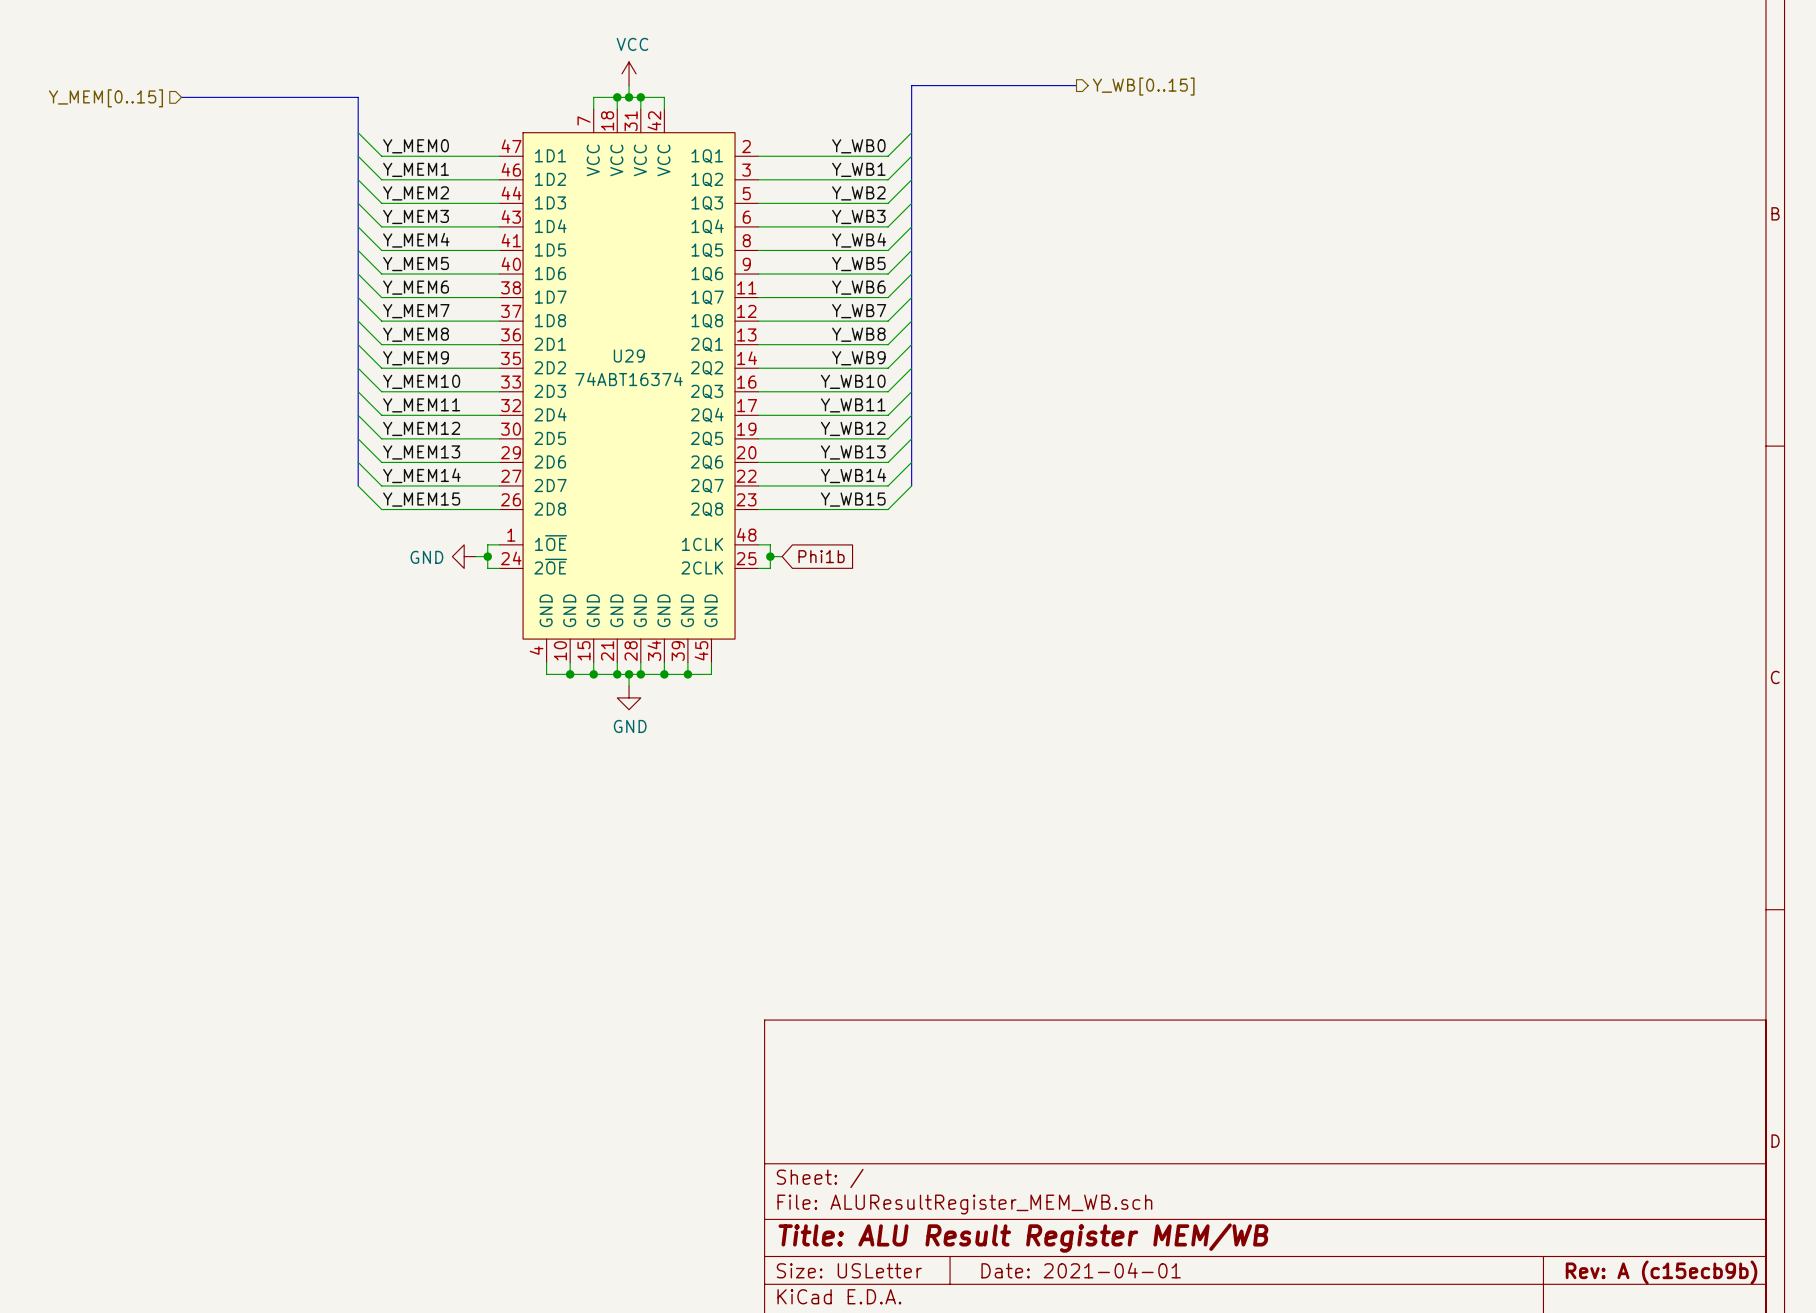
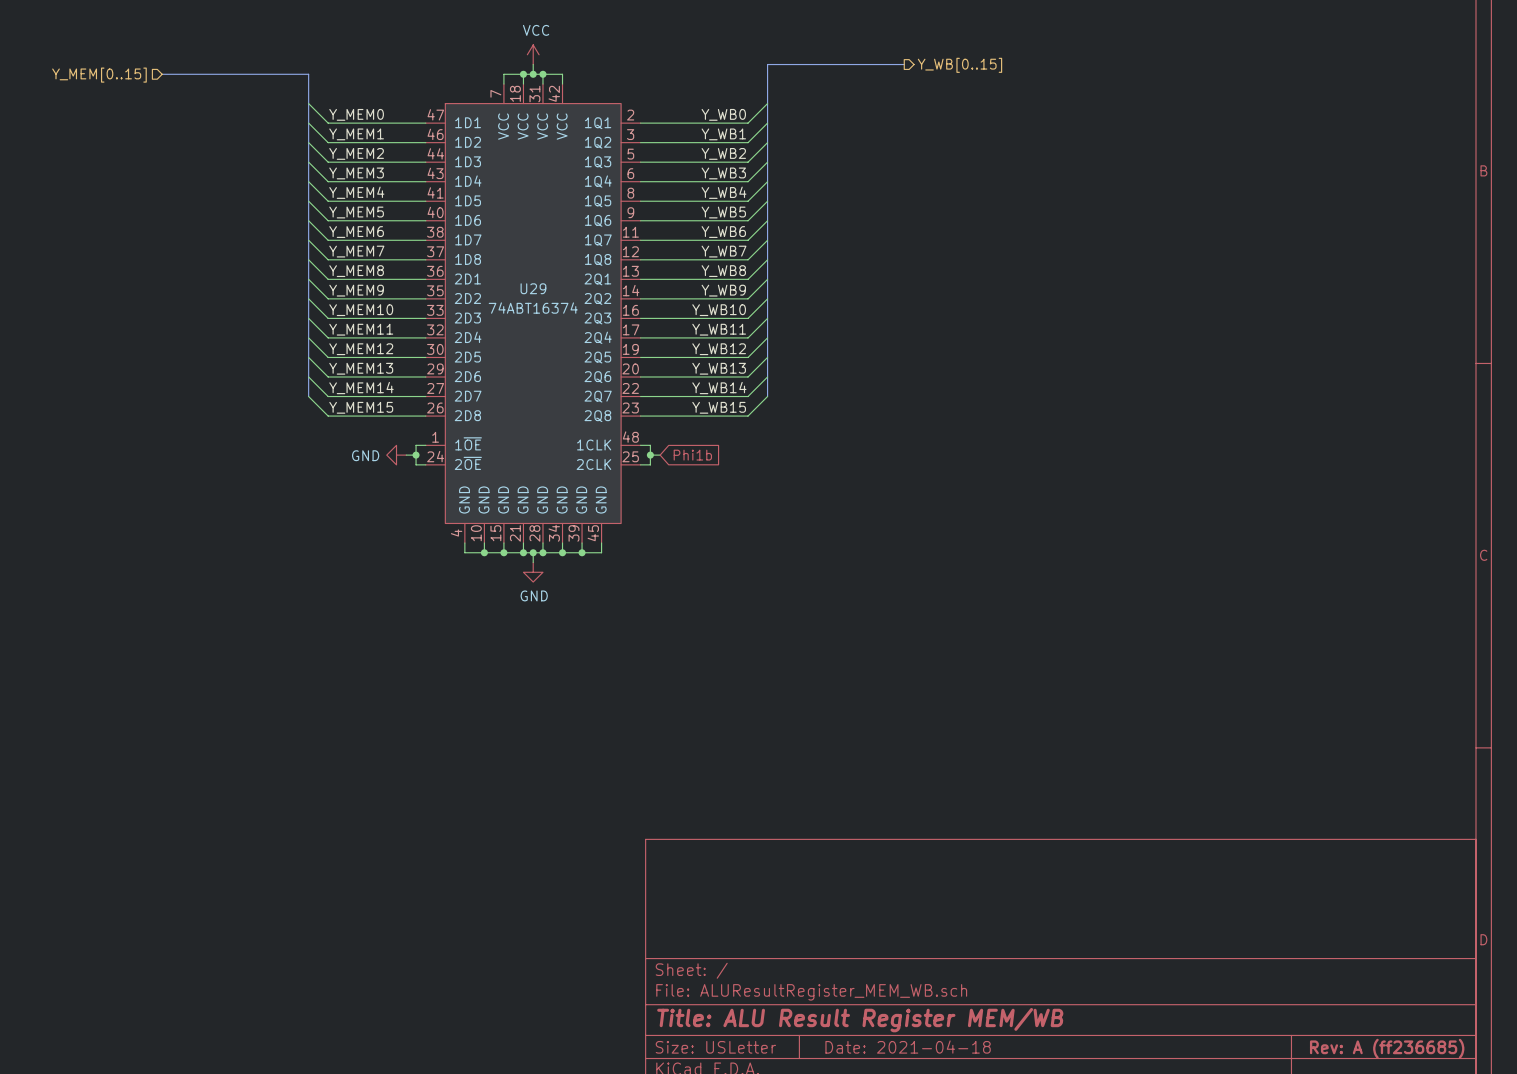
title block: Date: 2021-04-01 (1081, 1270) -> Date: 2021-04-18 (908, 1047)
title block: Rev: A (c15ecb9b) (1661, 1272) -> Rev: A (ff236685) (1387, 1048)

